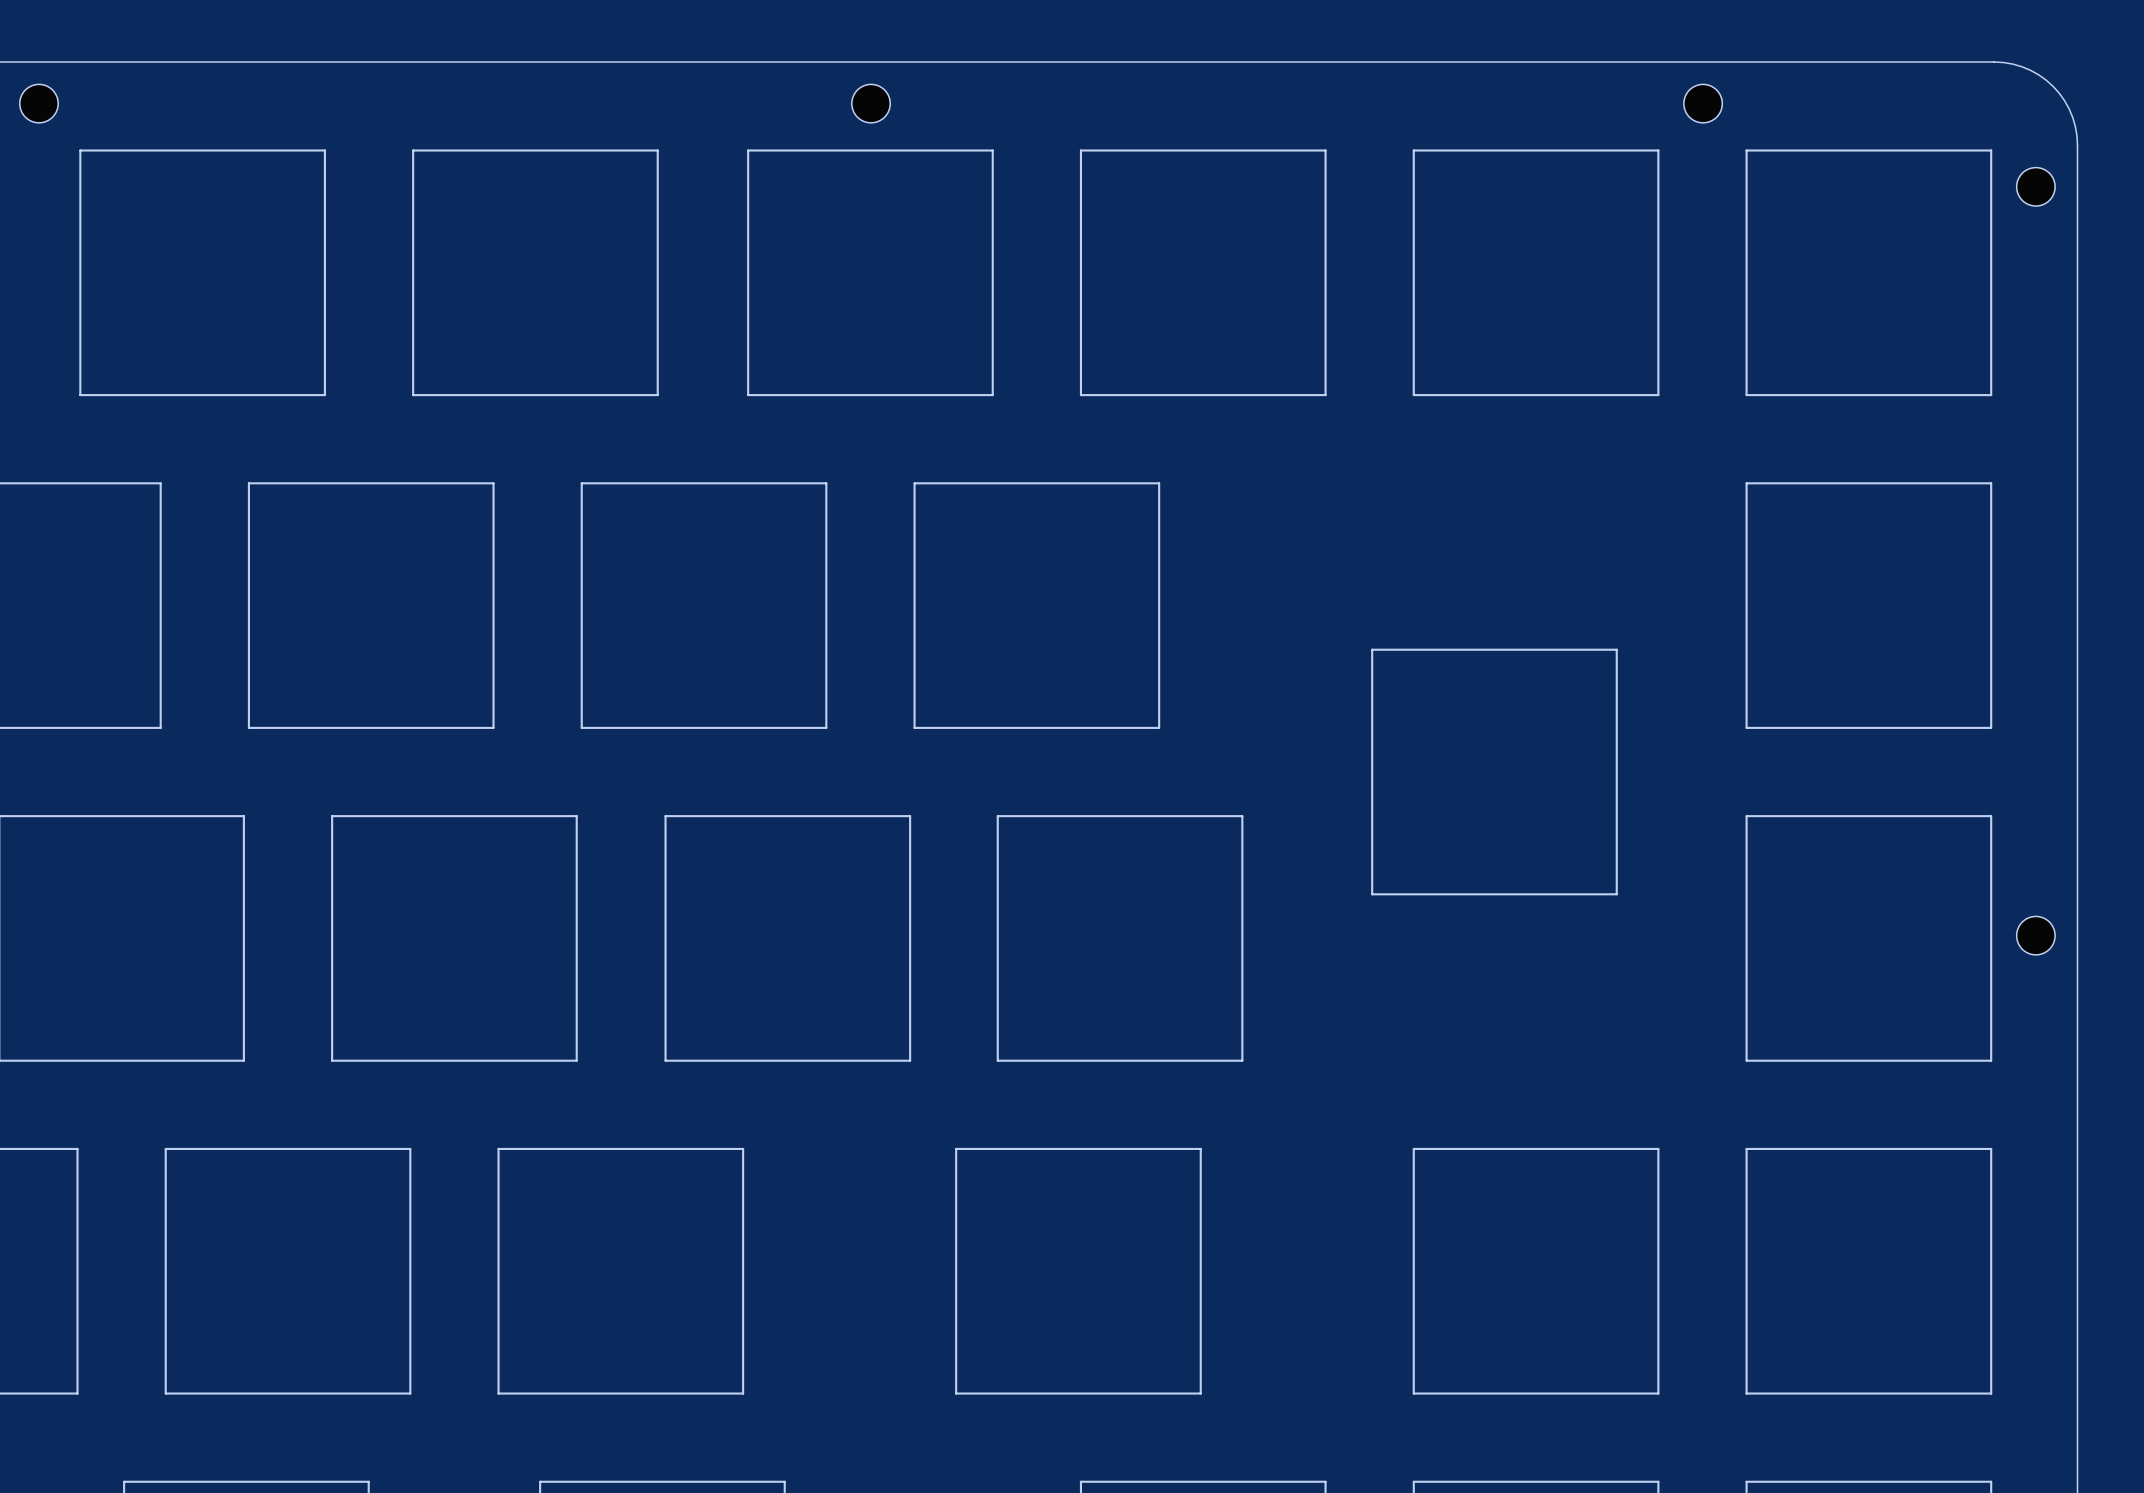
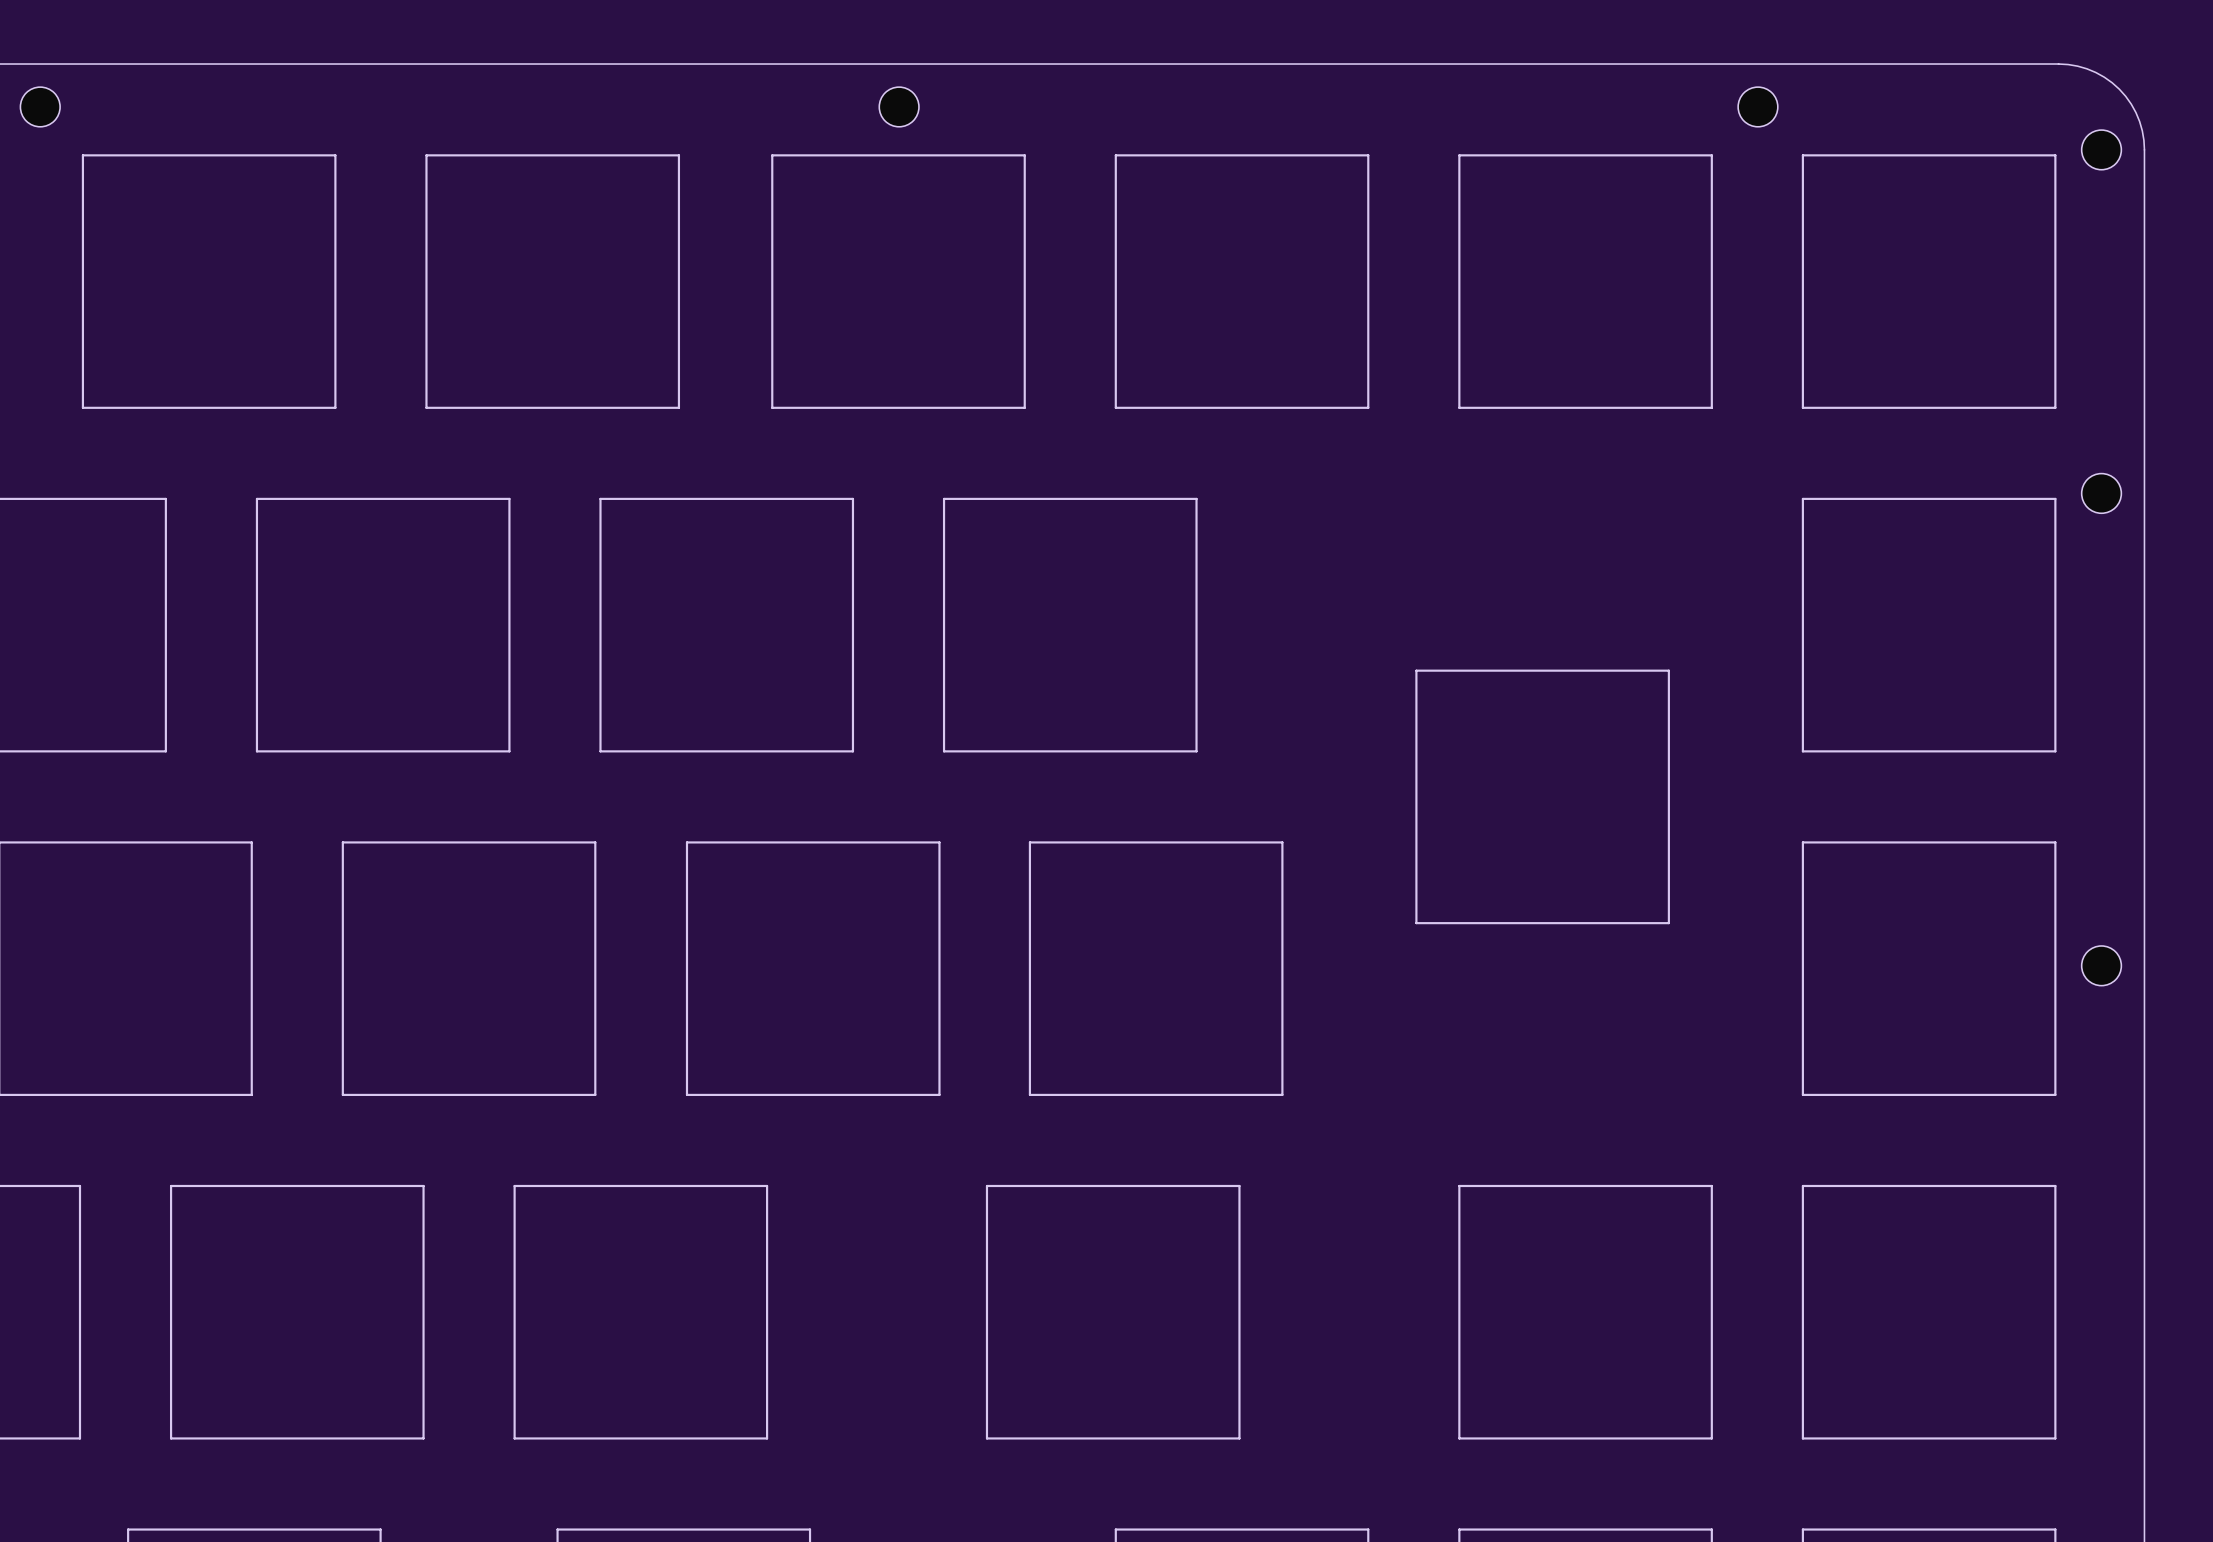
part position: (2035, 186) -> (2101, 149)
part: none -> (2101, 493)

